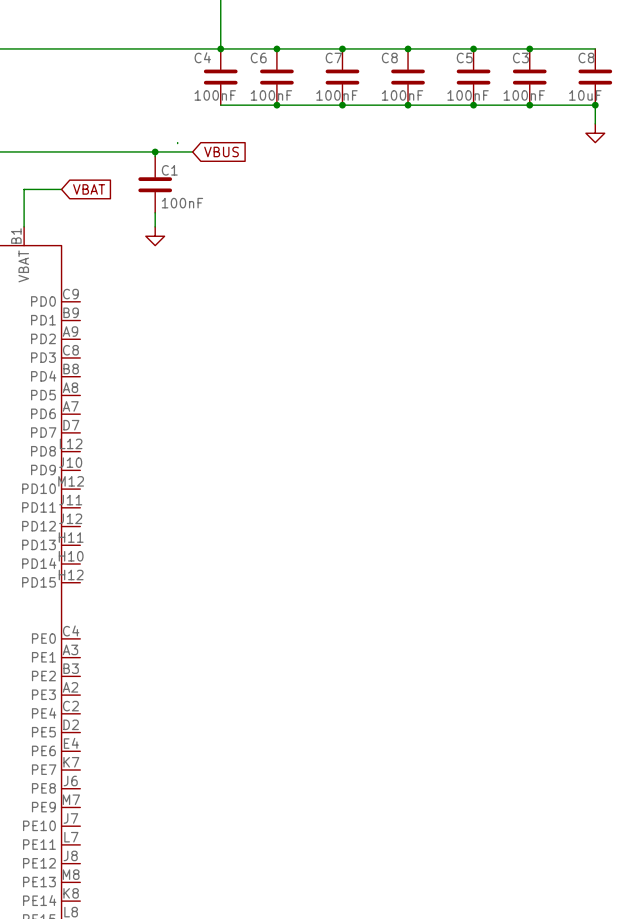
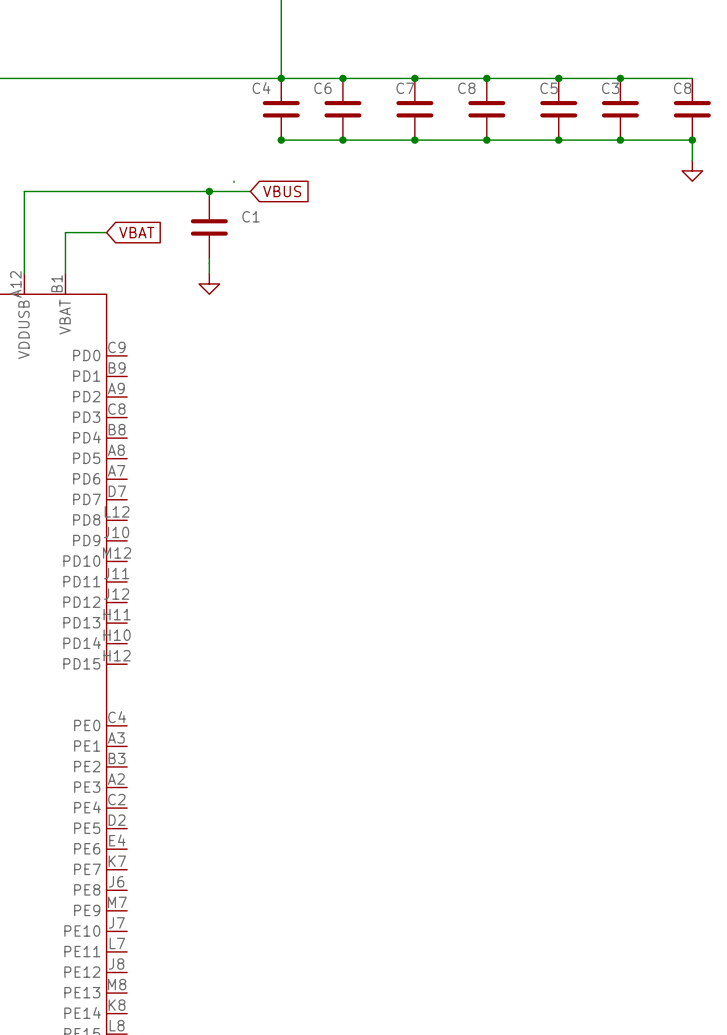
C4 value: 100nF (215, 95) -> none
C6 value: 100nF (271, 95) -> none
C7 value: 100nF (336, 95) -> none
C8 value: 100nF (402, 95) -> none
C5 value: 100nF (468, 95) -> none
C3 value: 100nF (524, 95) -> none
C8 value: 10uF (585, 95) -> none
junction: none -> (281, 140)
C1 name position: C1 (169, 170) -> C1 (251, 216)
C1 value: 100nF (182, 203) -> none

